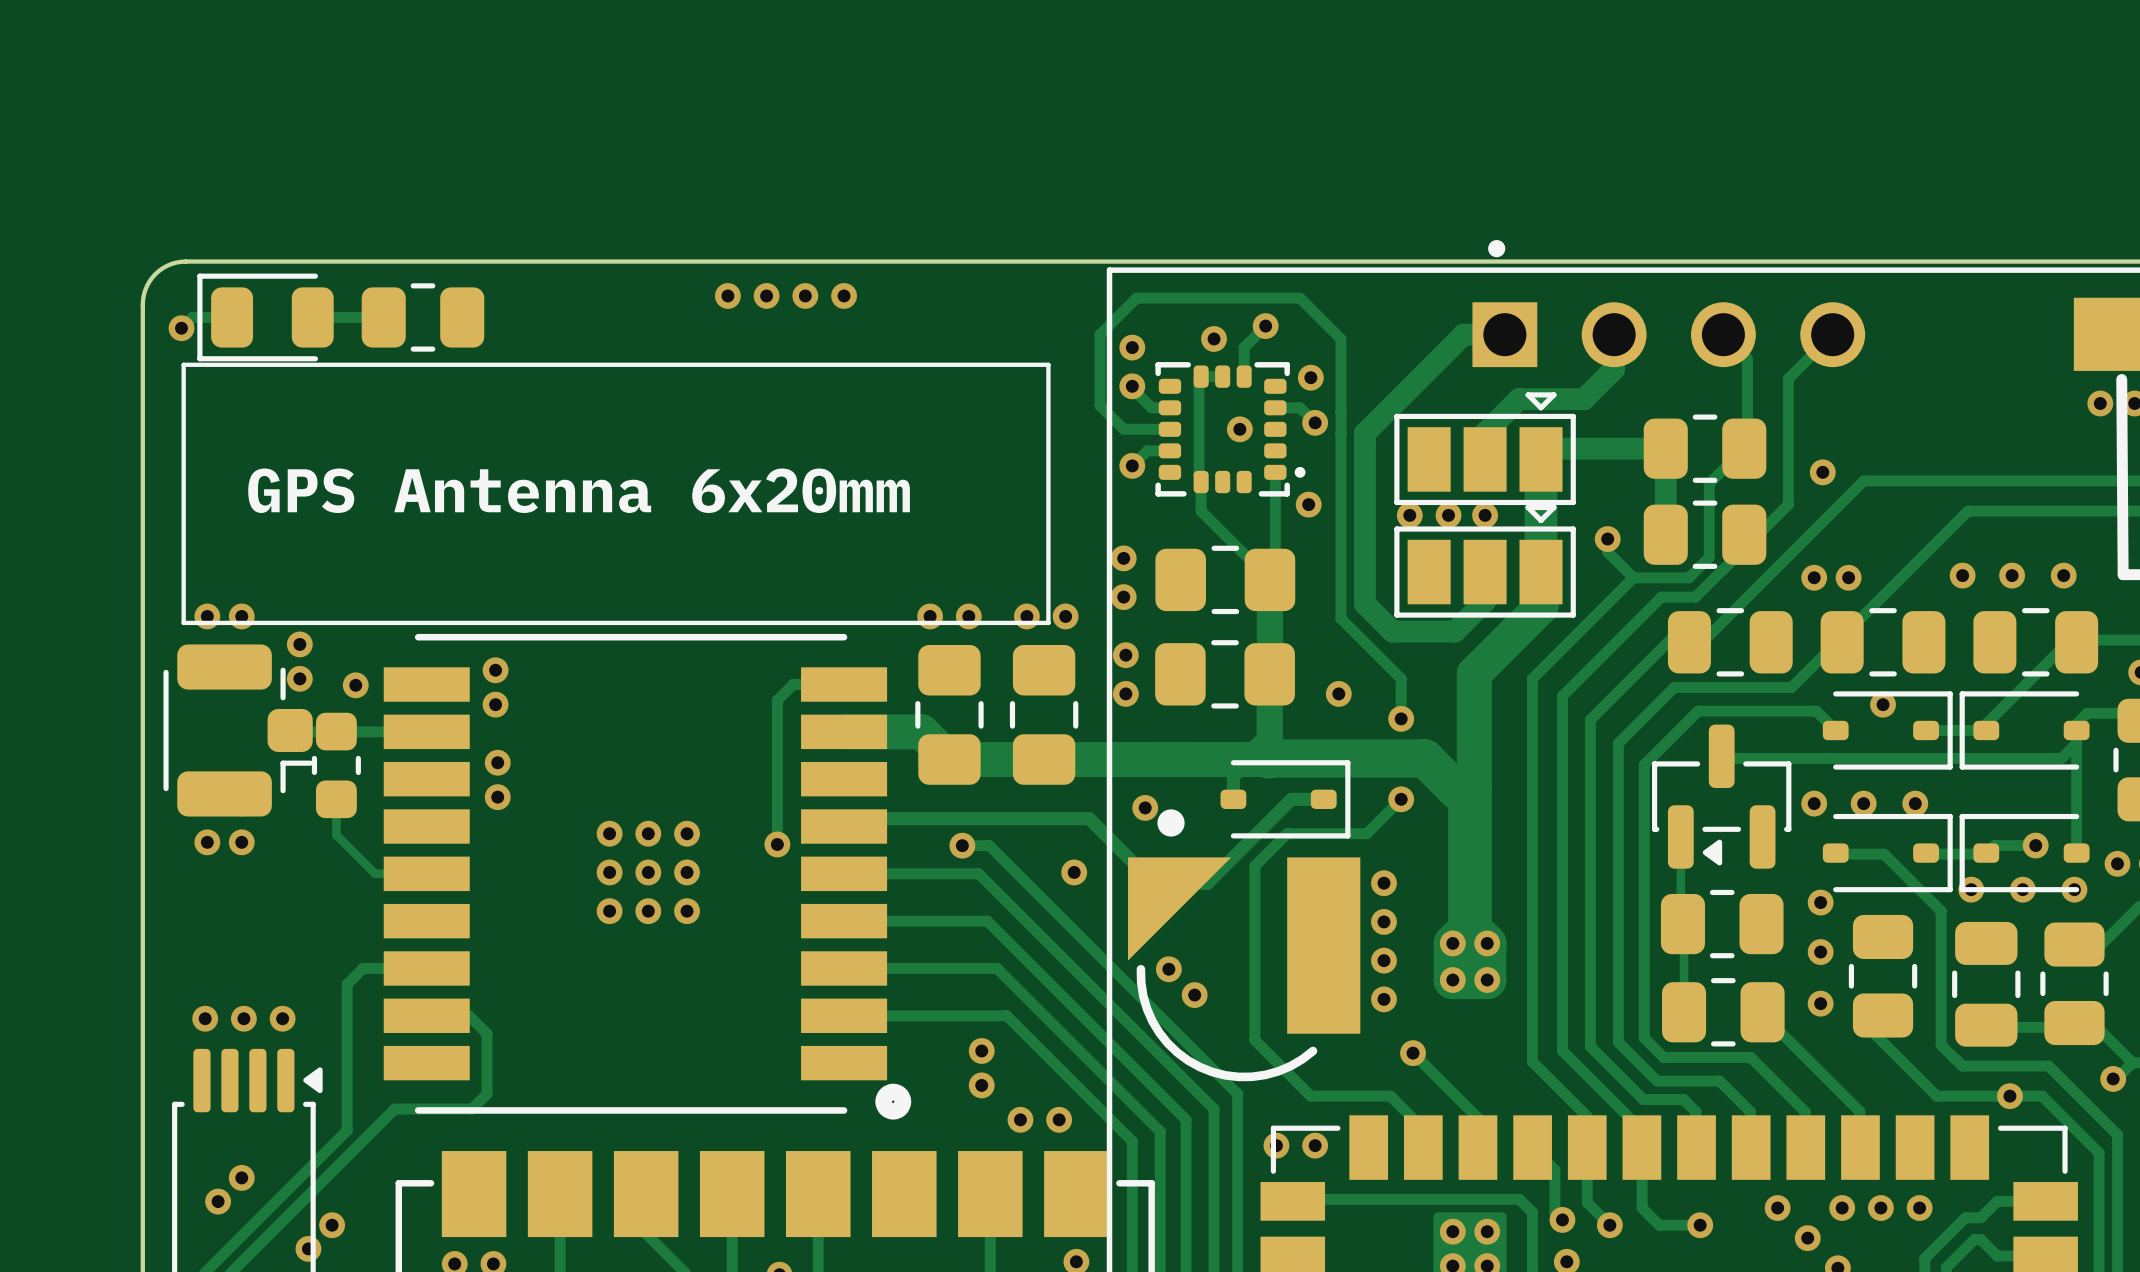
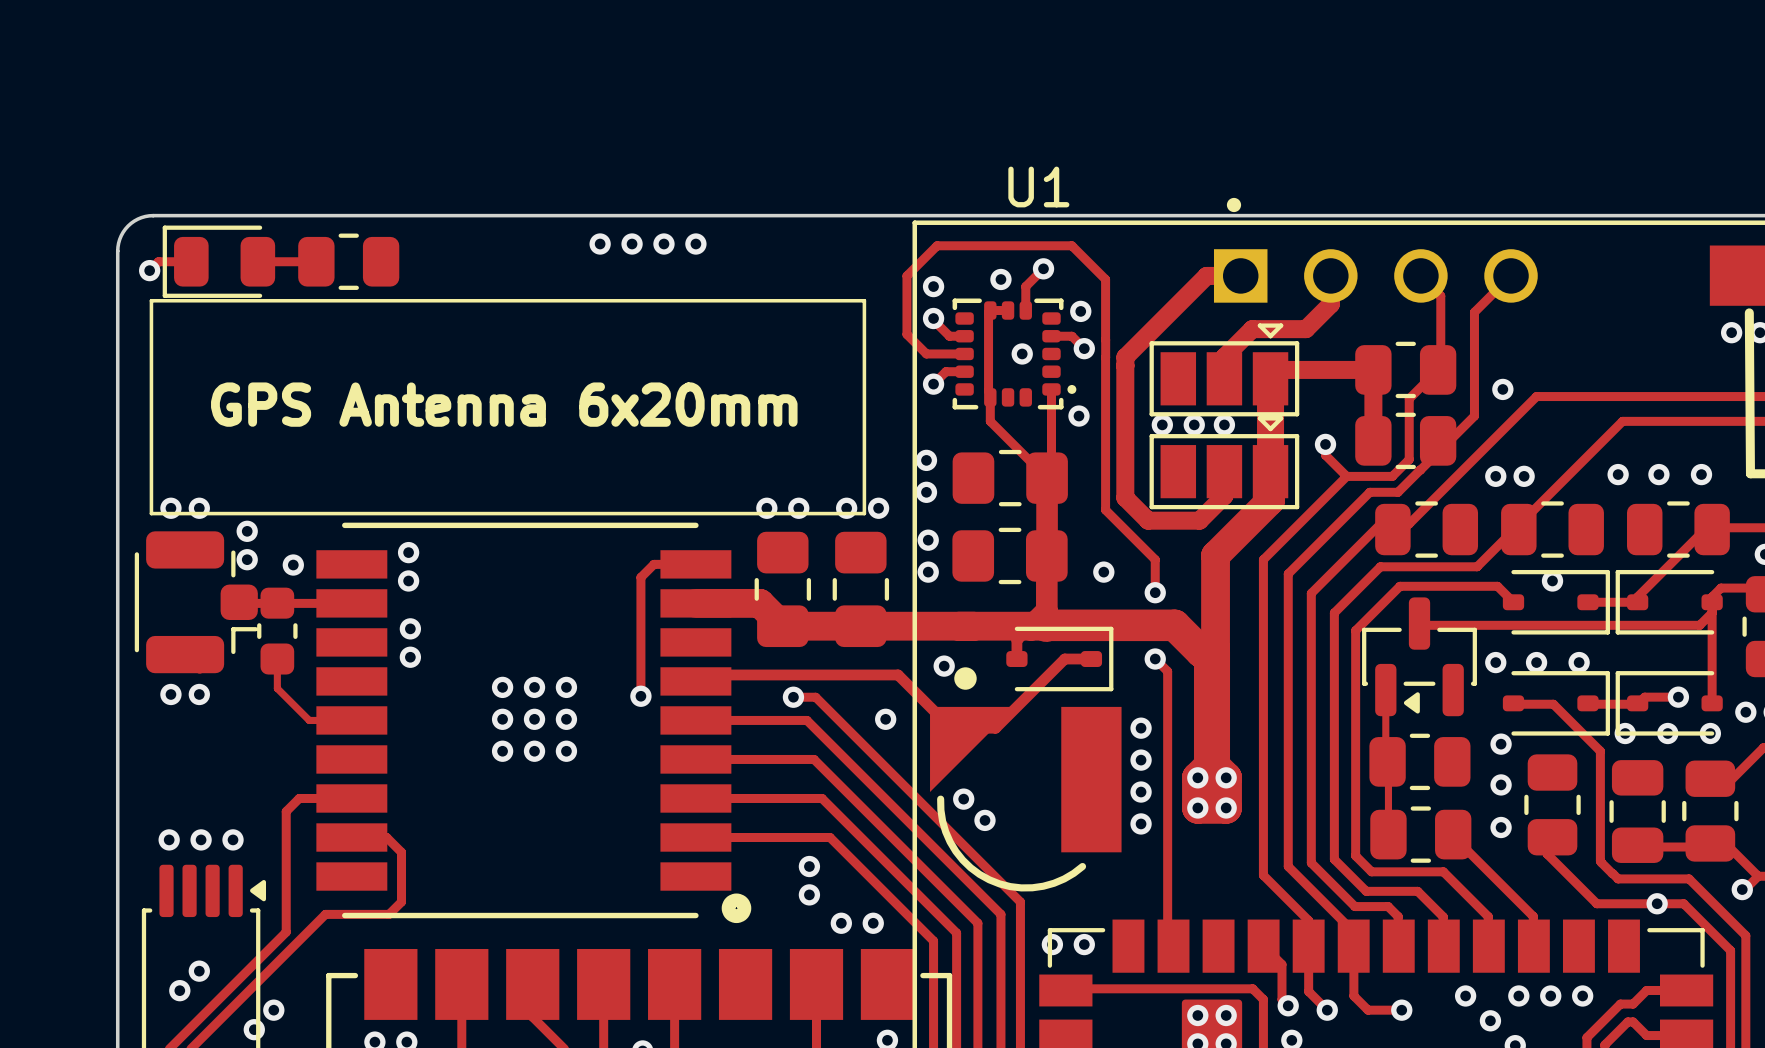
U1 name: none -> U1 (1038, 186)
track: (1401, 799) (1366, 833) (1287, 833) (1254, 866) (1254, 1040) (1310, 1096) (1390, 1096) (1423, 1129) (1423, 1147) -> (1155, 659) (1167, 671) (1167, 940) (1173, 946)
track: (1413, 1053) (1477, 1118) (1477, 1147) -> none
via: (1413, 1053) -> none

